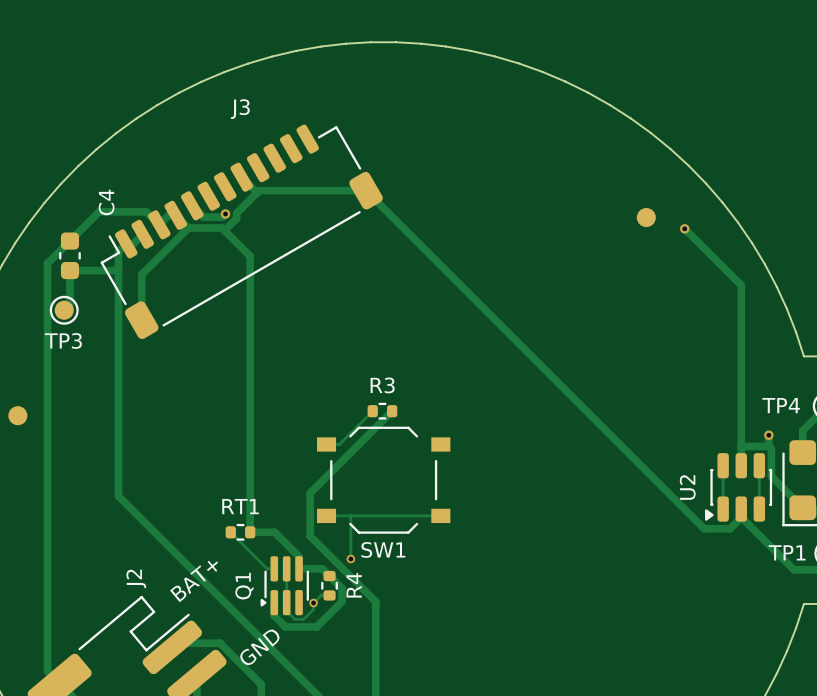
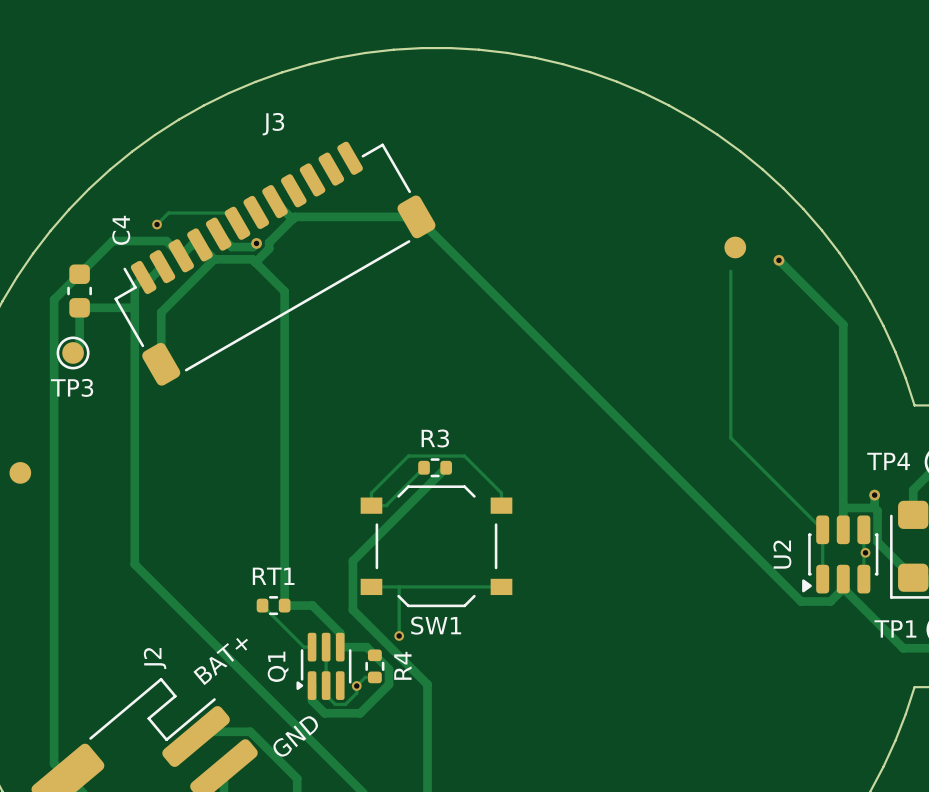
track: none -> (237, 223) (227, 213) (168, 213) (157, 224)
via: none -> (157, 224)
track: none -> (730, 271) (730, 437) (822, 529)
track: none -> (371, 505) (371, 493) (408, 456) (464, 456) (501, 493) (501, 505)
via: none -> (865, 552)

